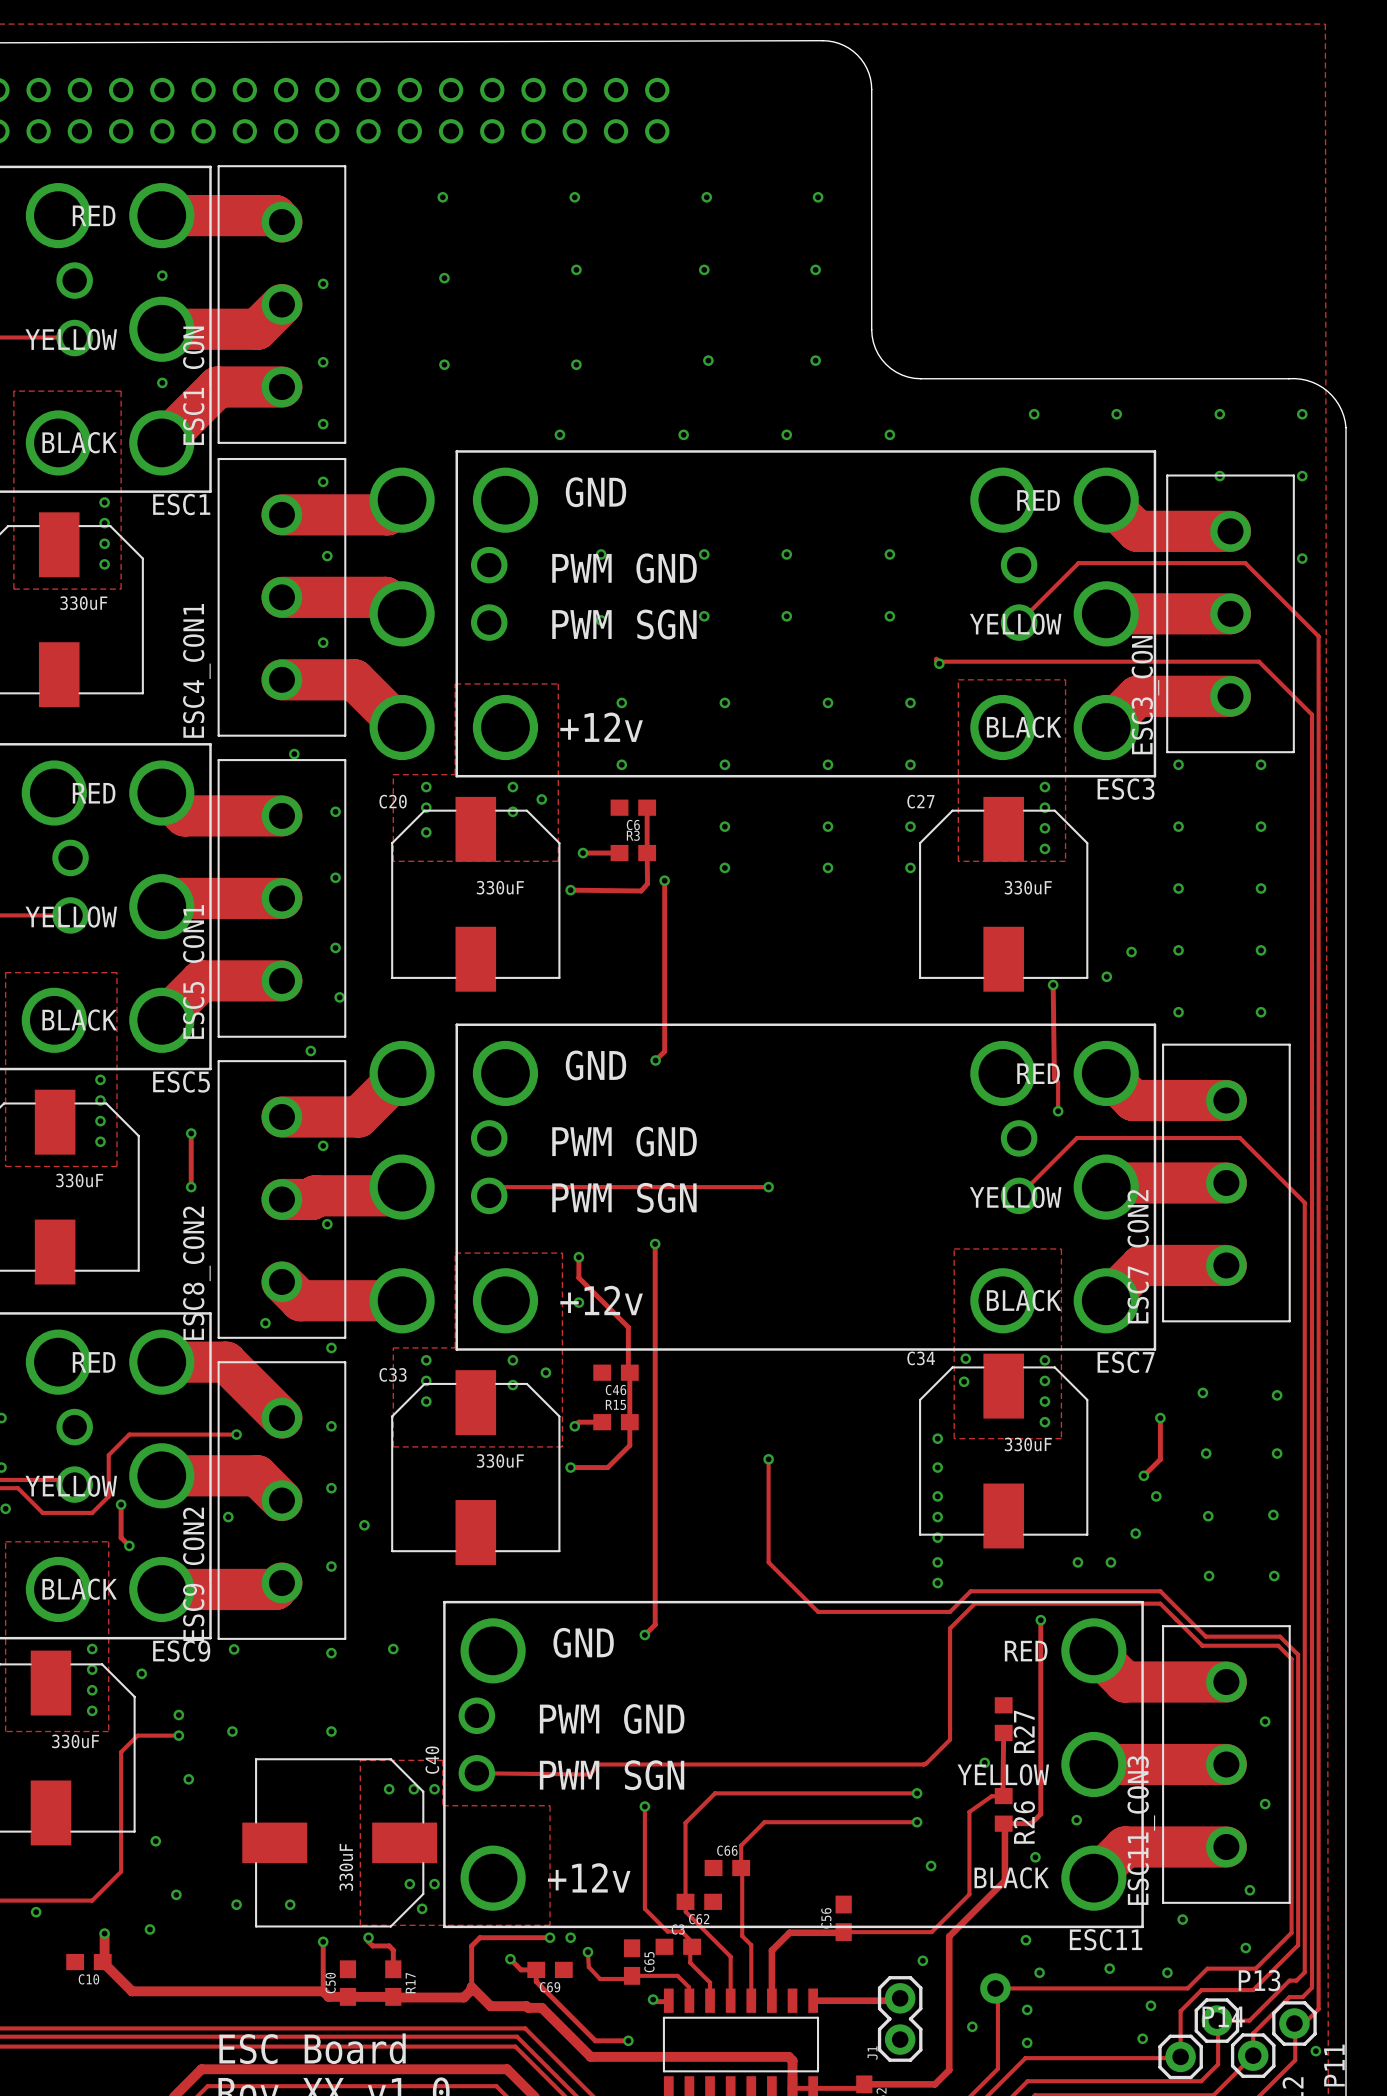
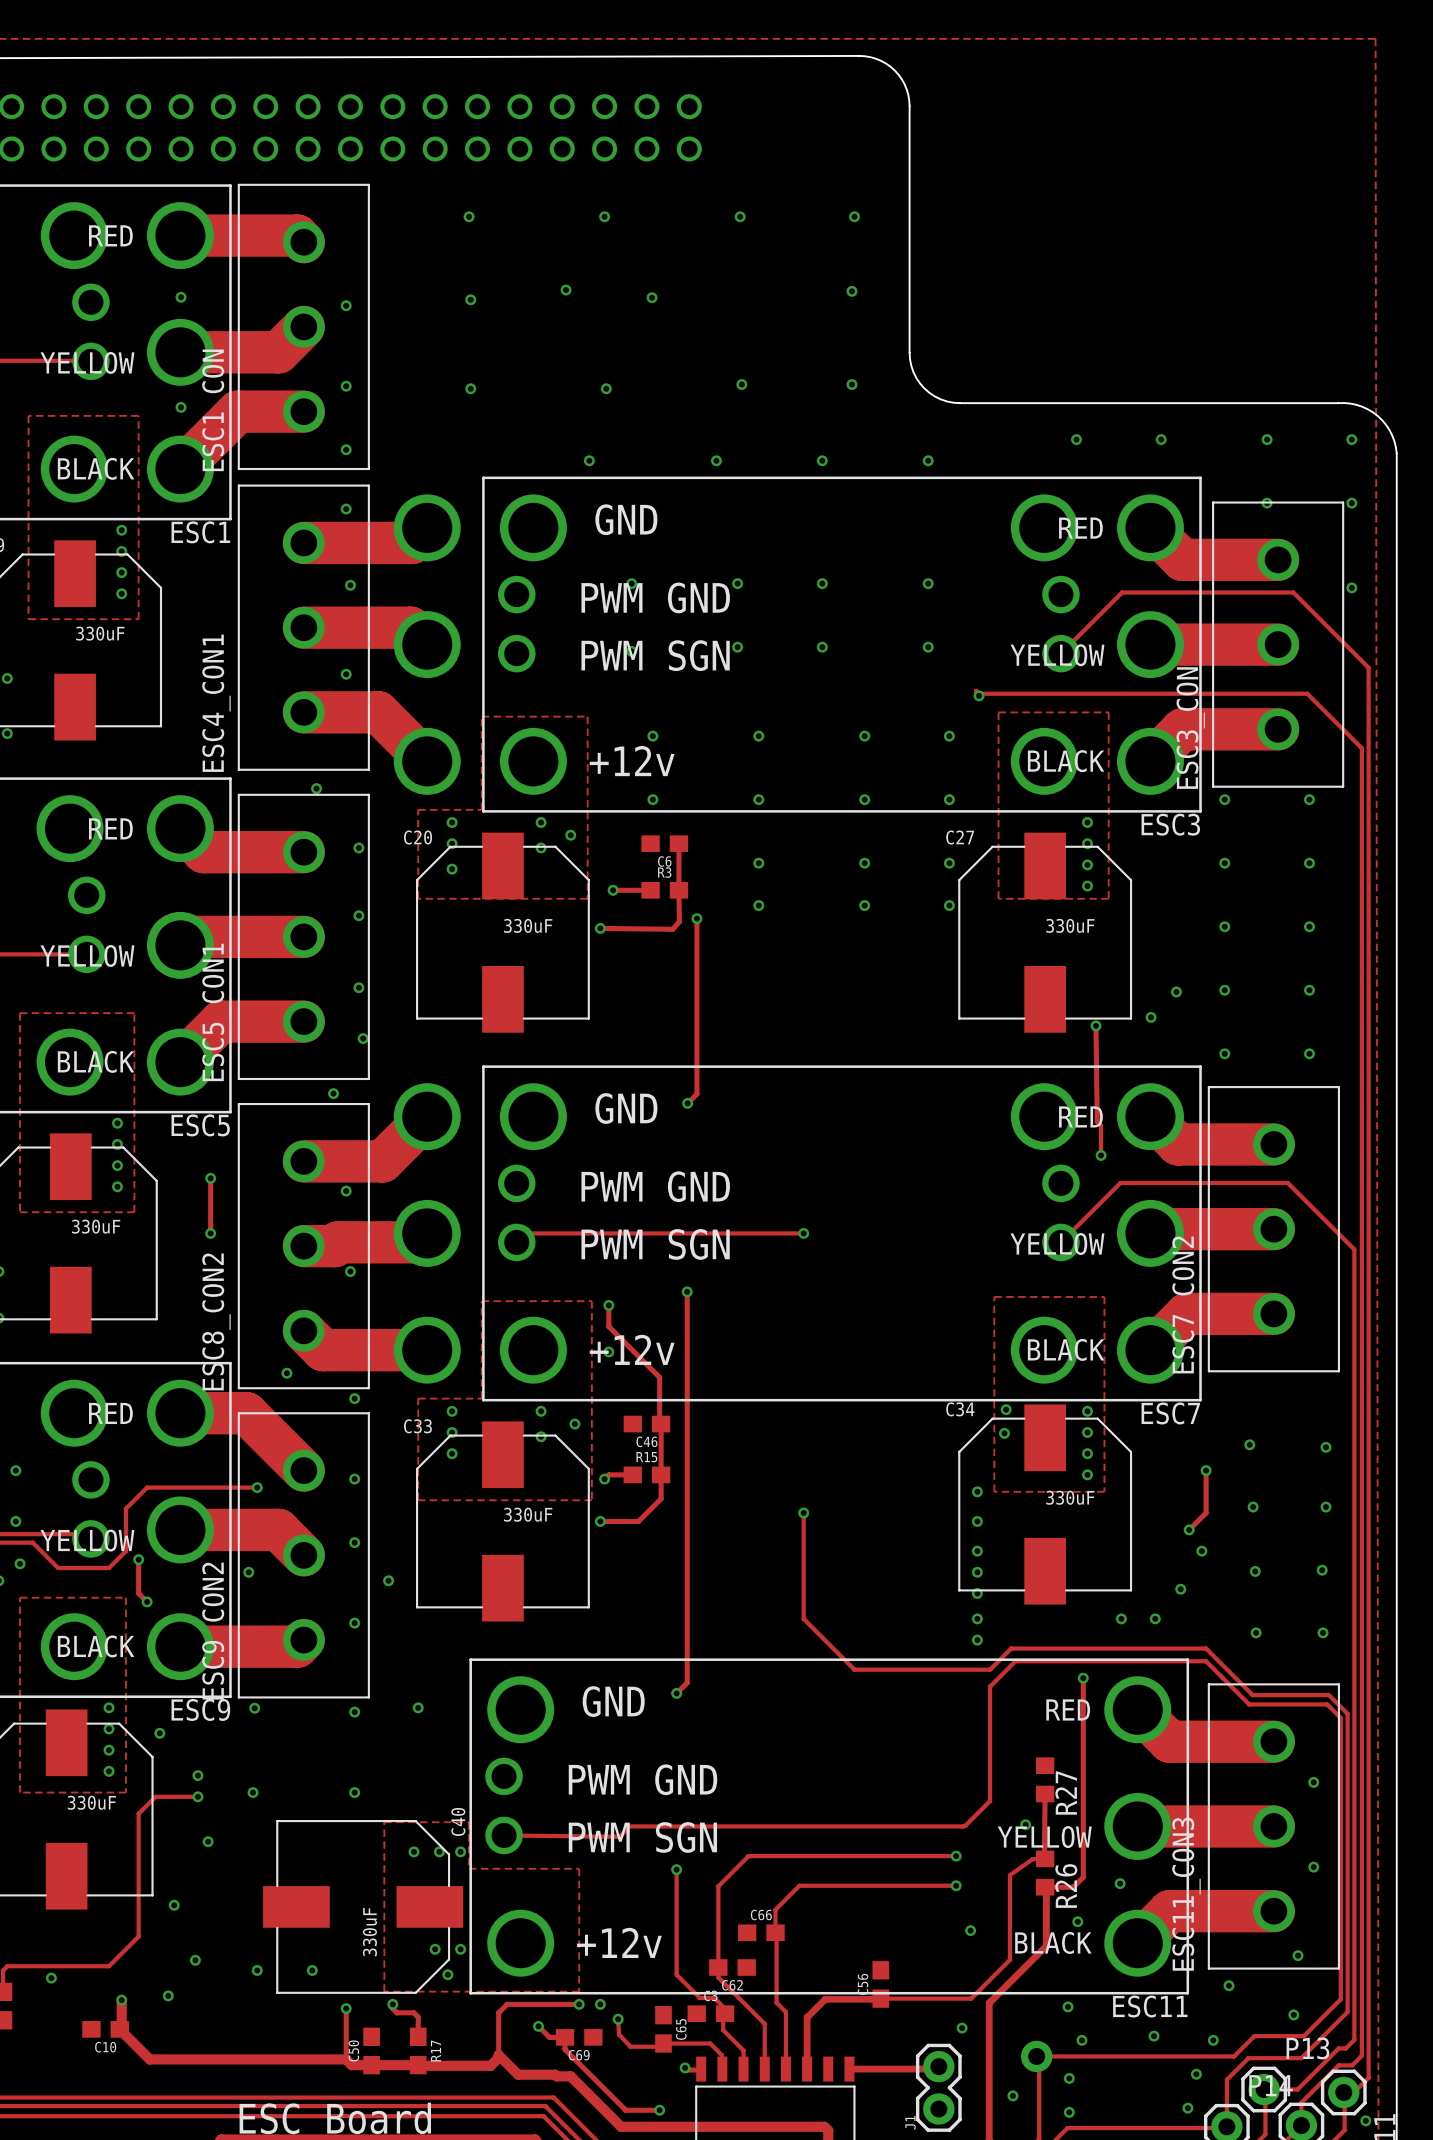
via: none -> (566, 290)
via: (576, 269) -> none
via: (704, 269) -> none
via: none -> (652, 297)

